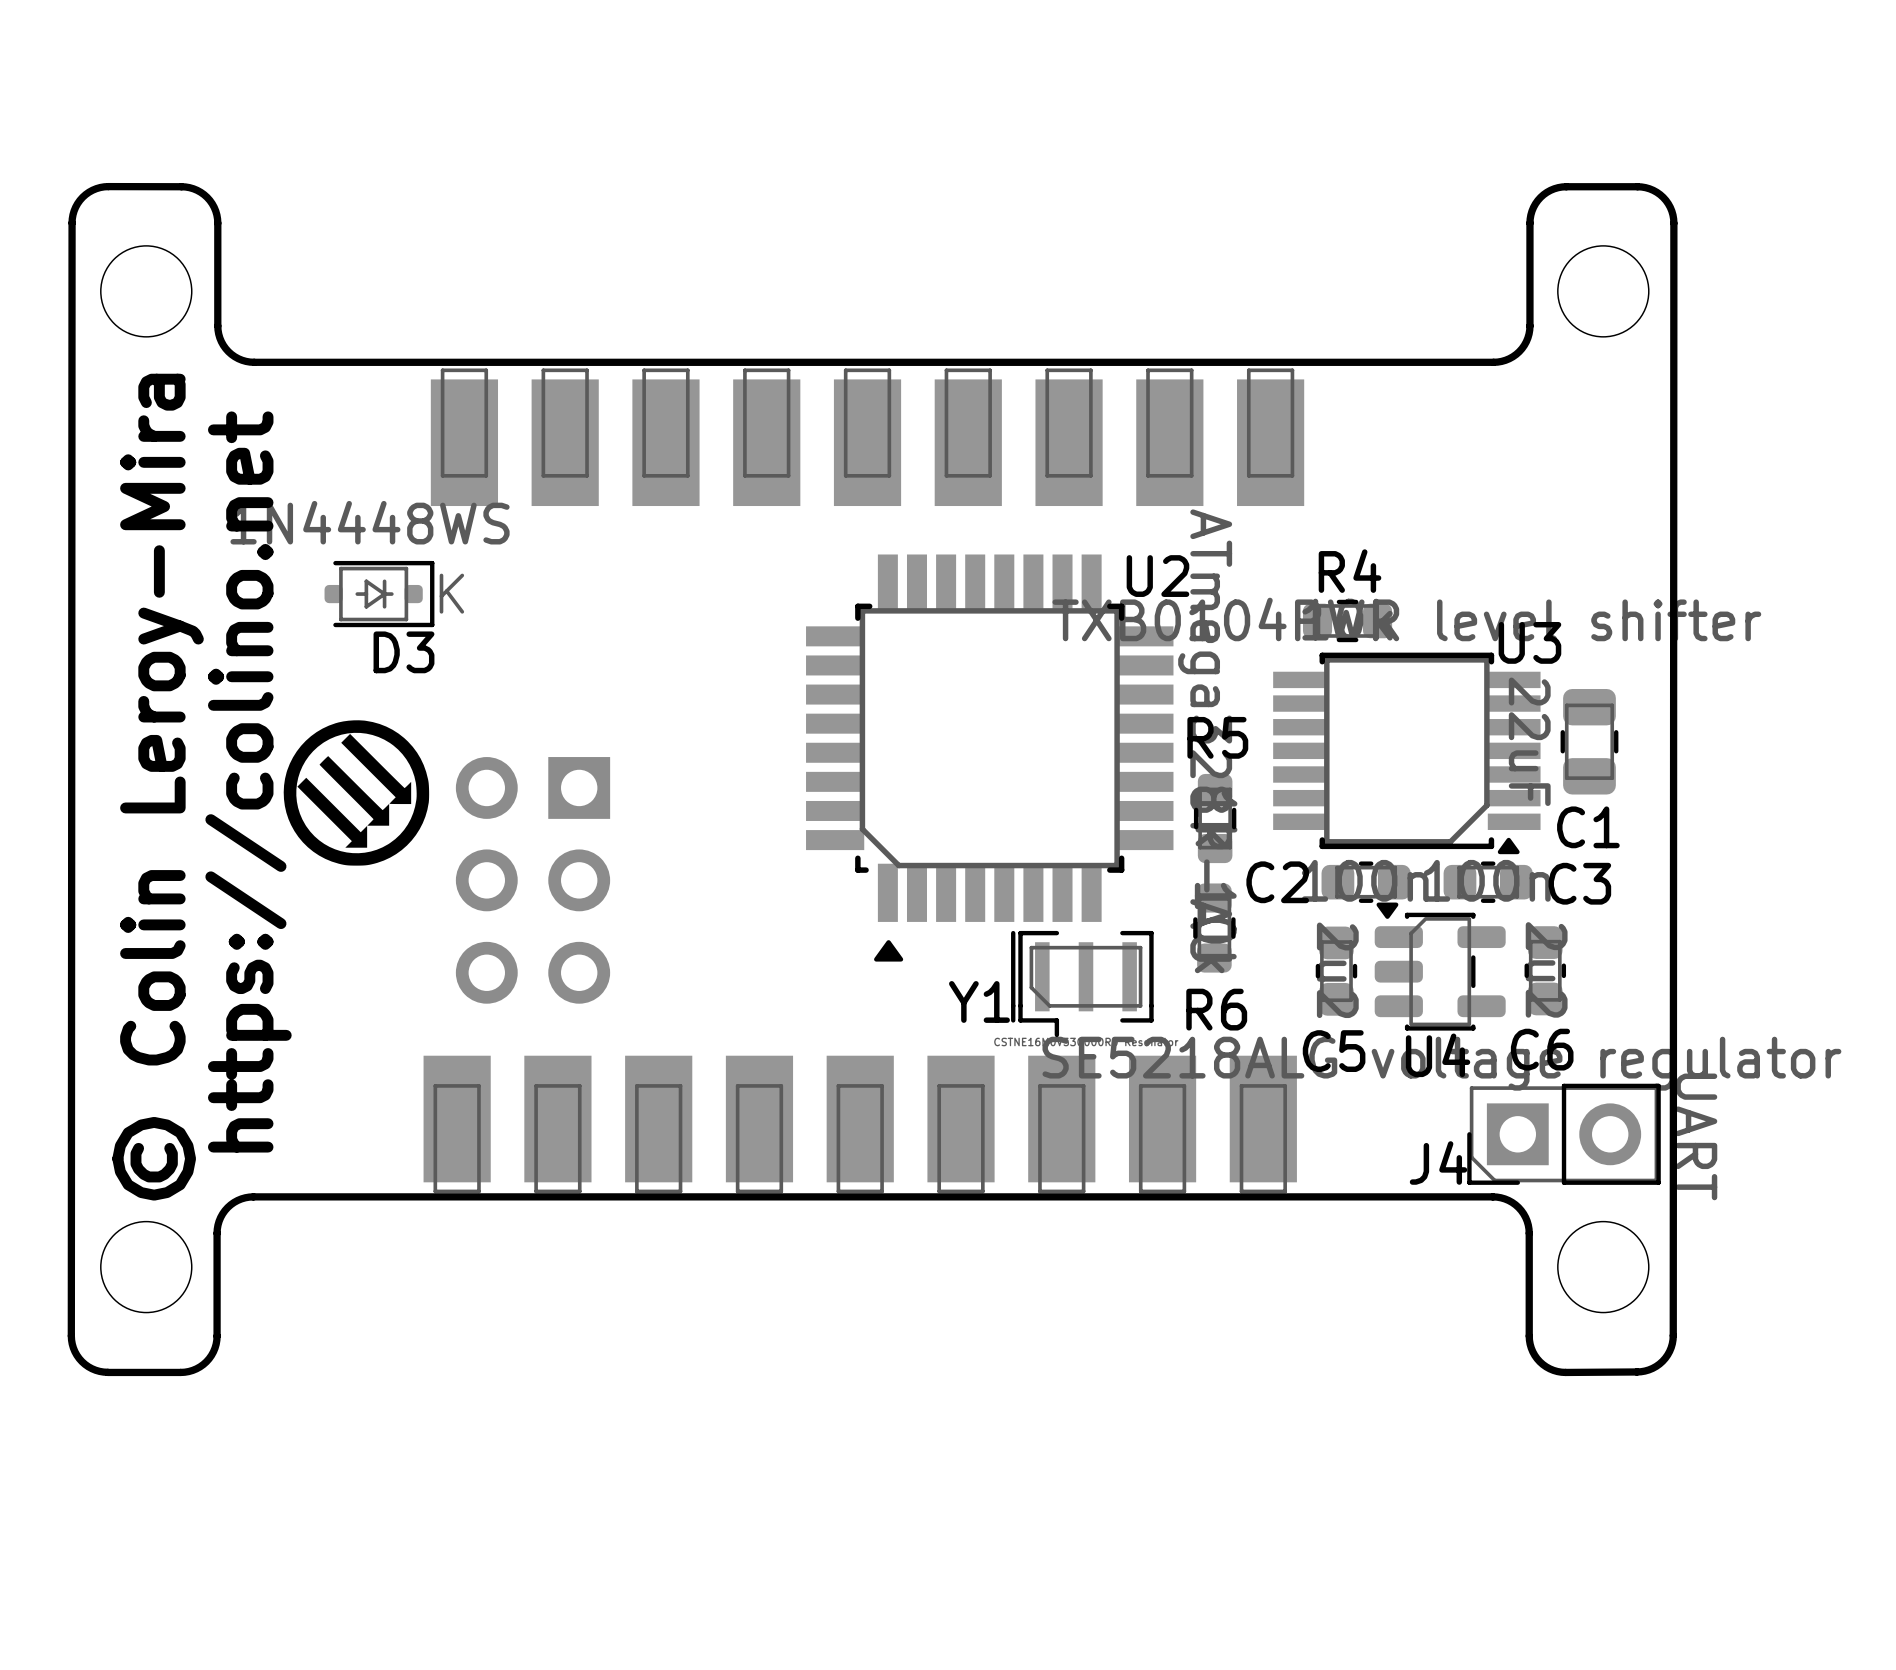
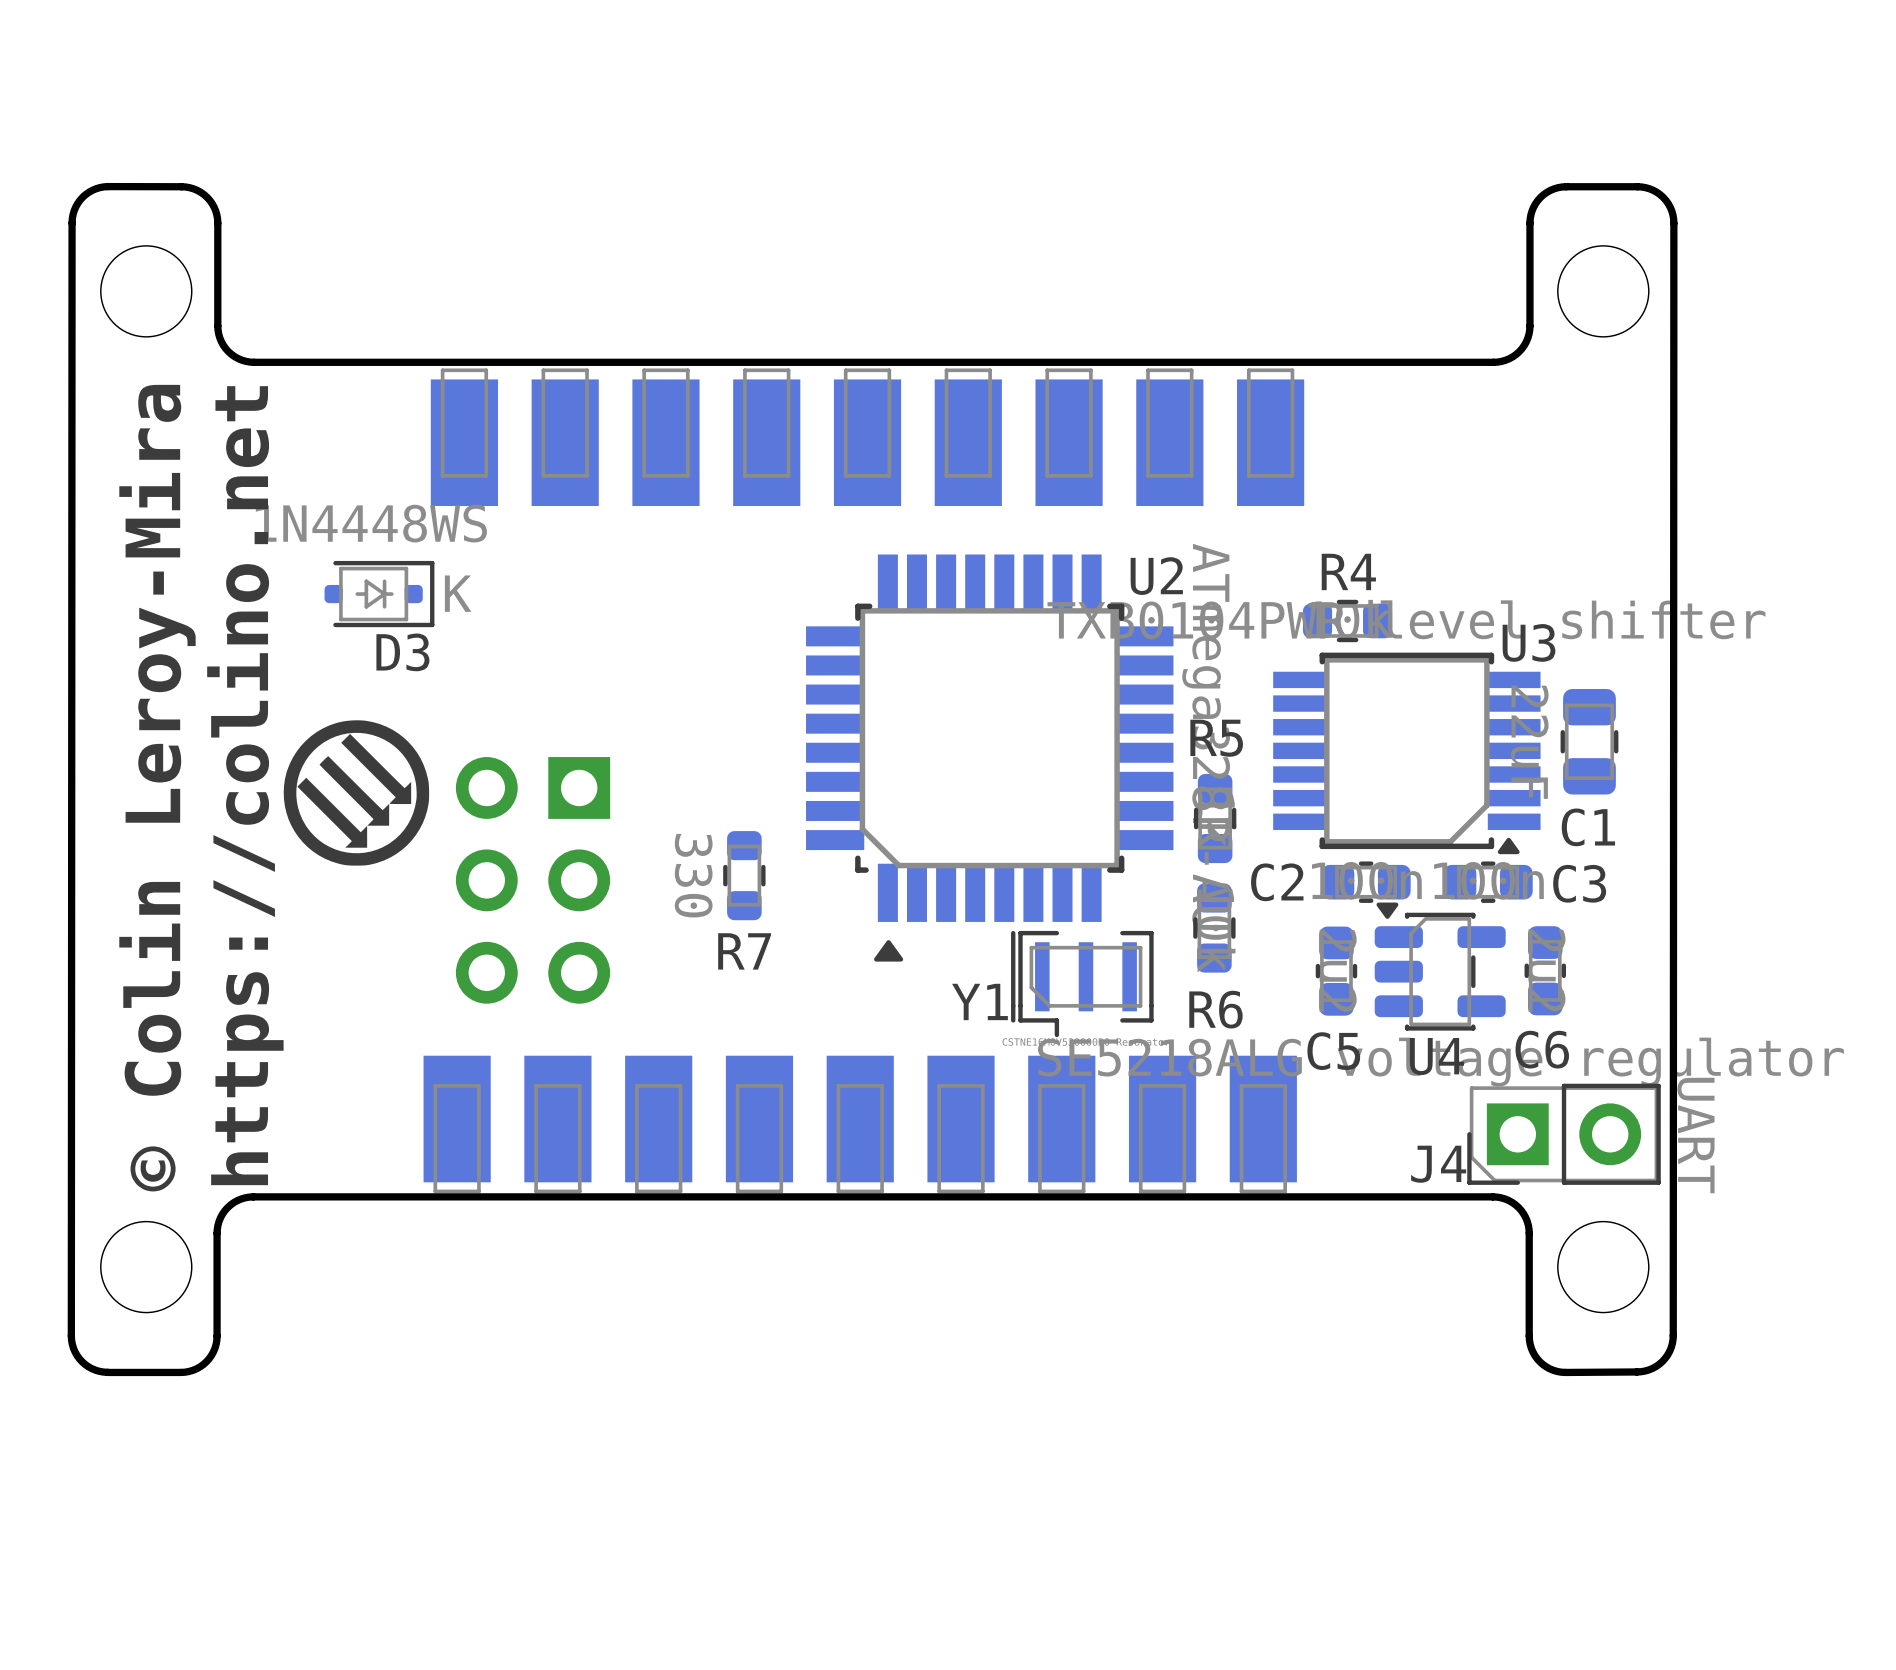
R7: none -> 330 (744, 875)

